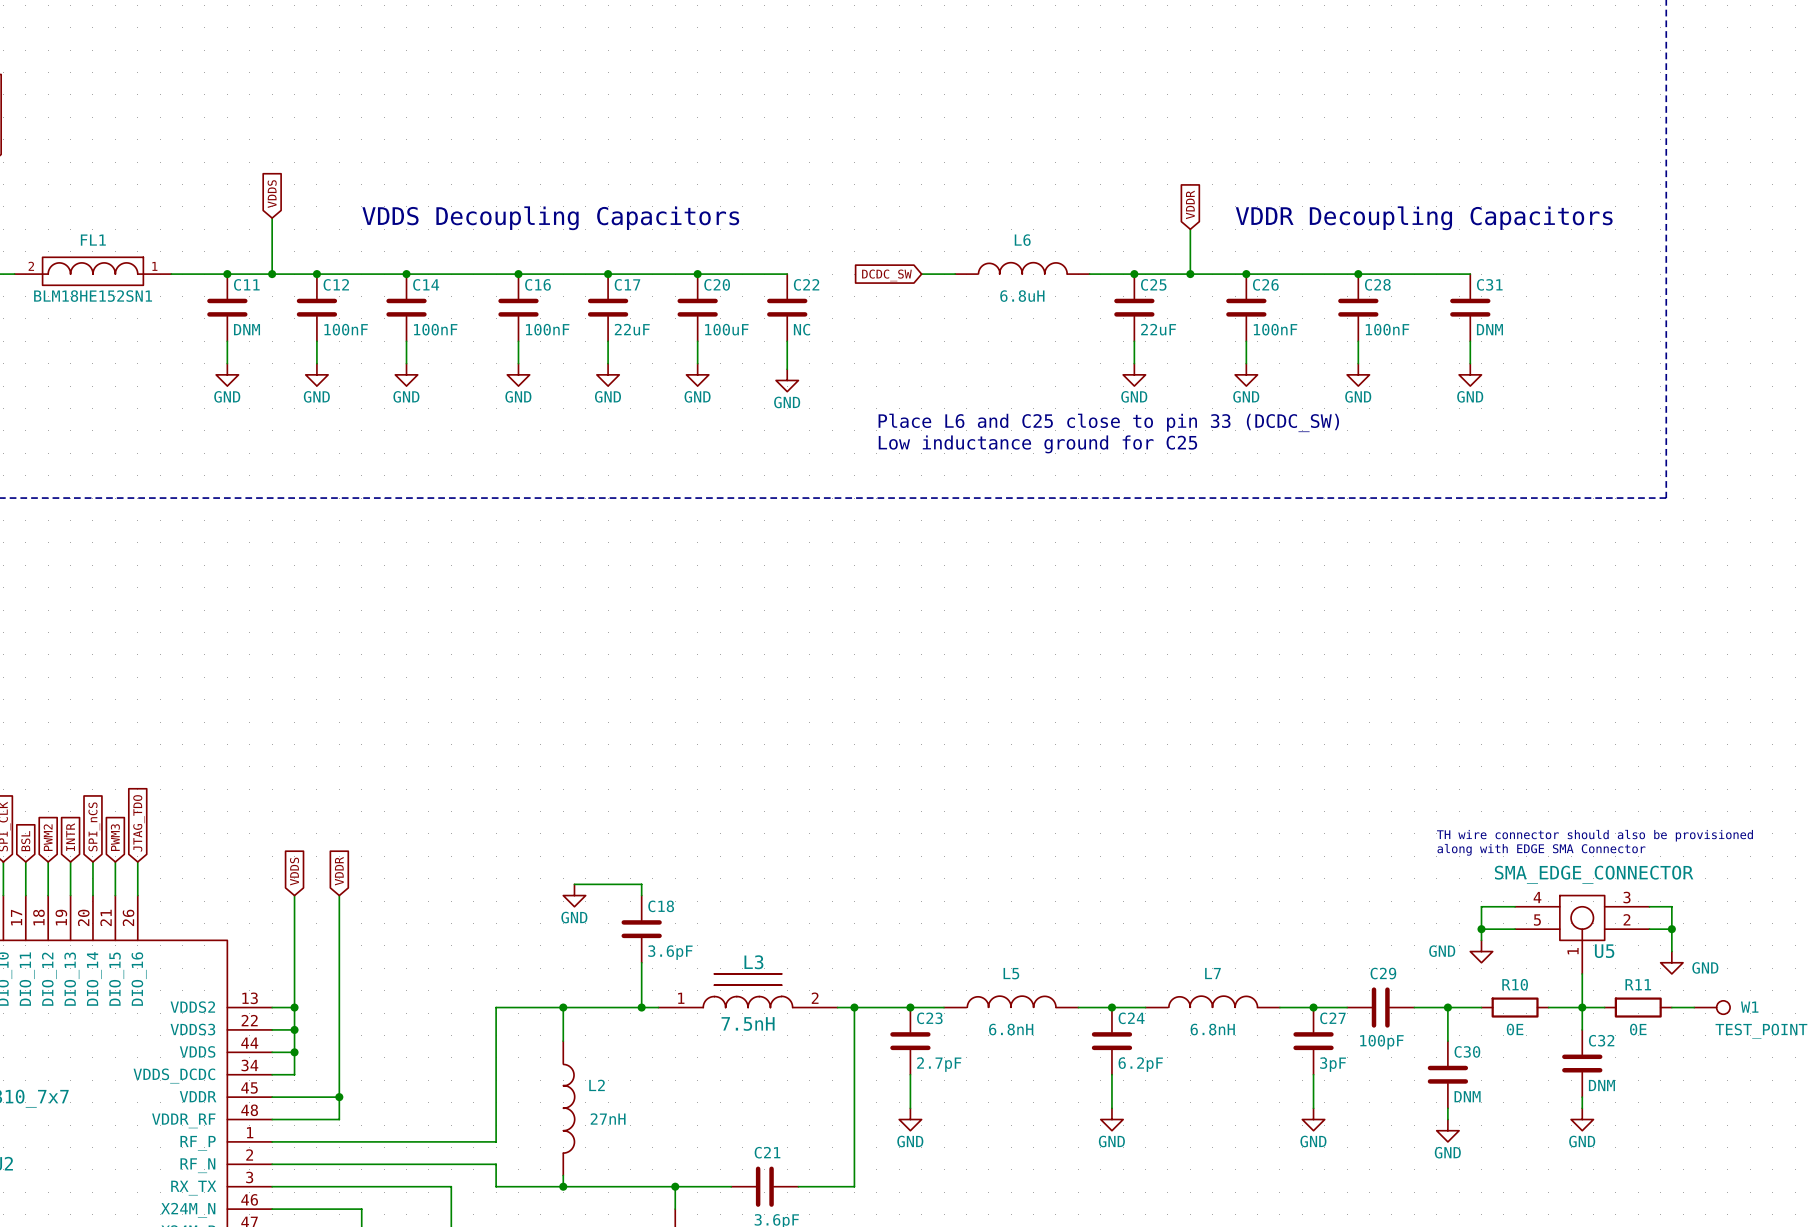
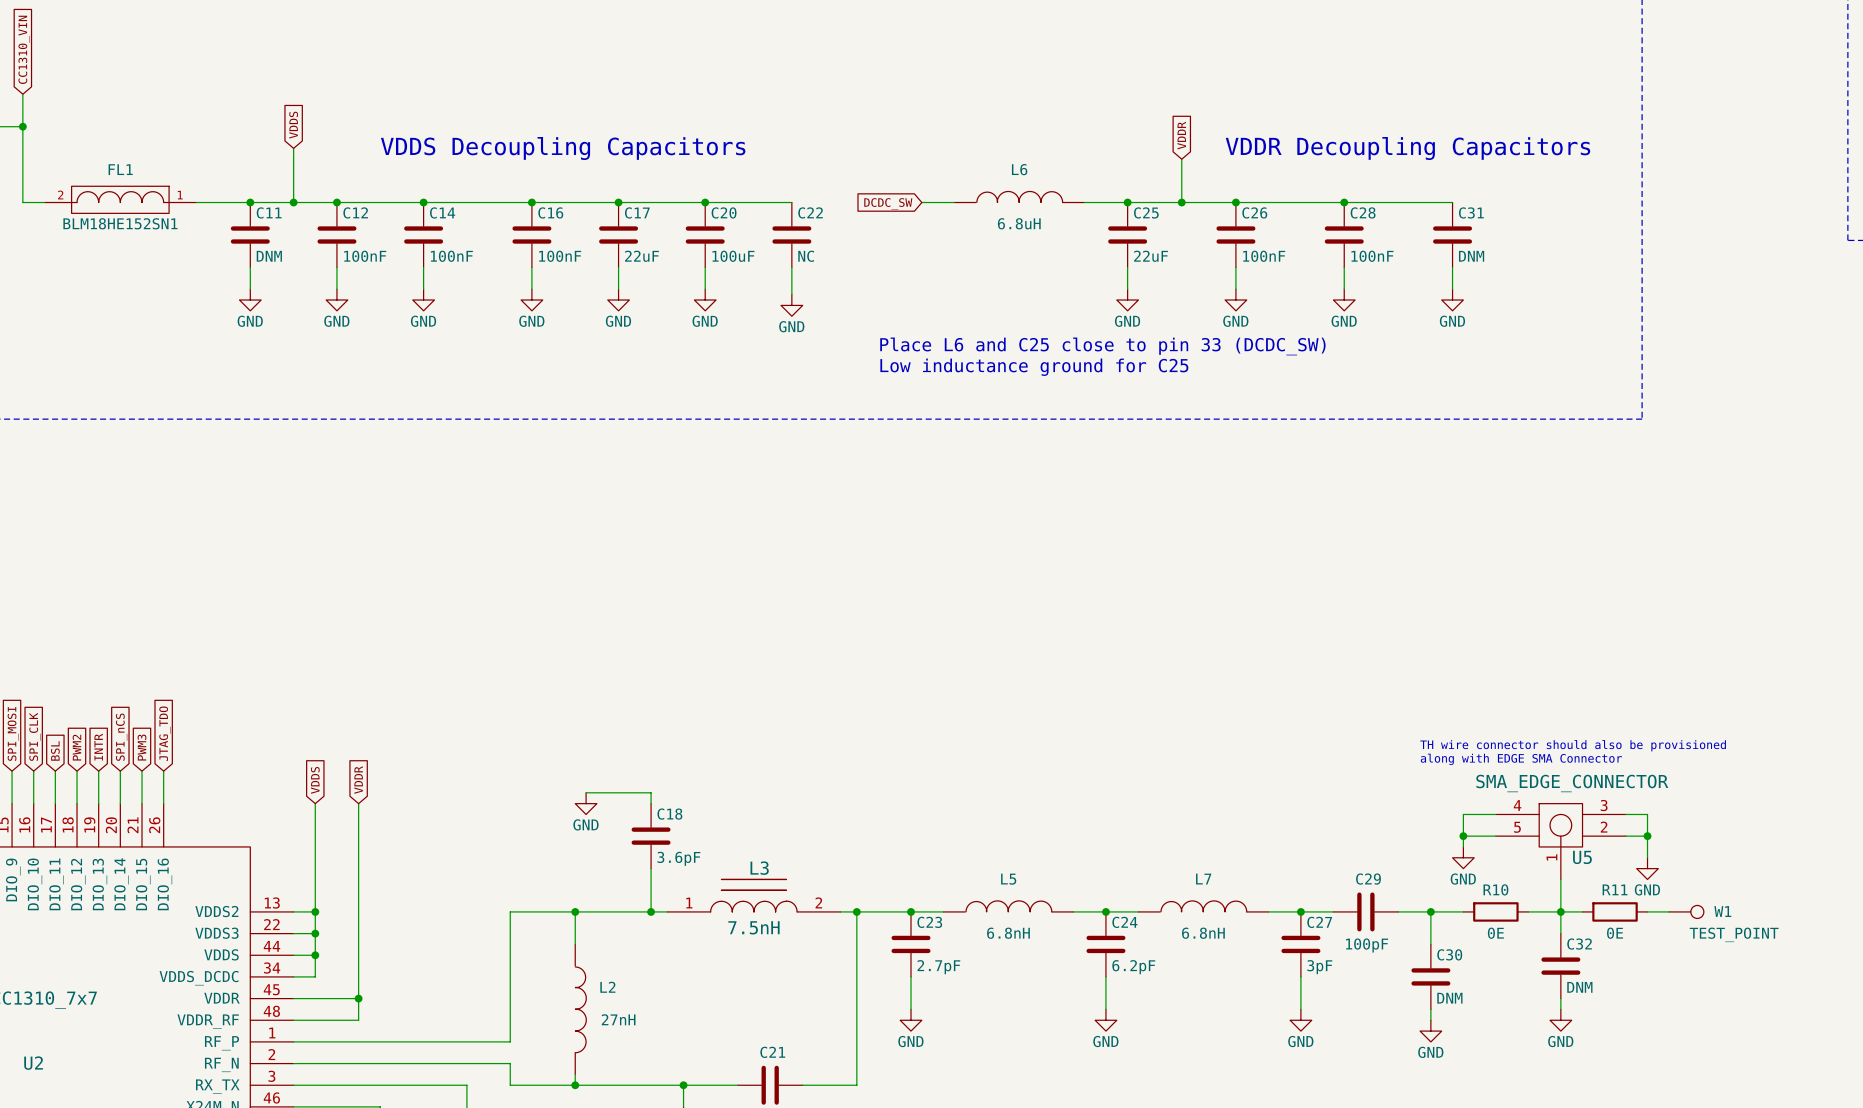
power symbol text position: GND (1442, 951) -> GND (1463, 879)
power symbol text position: GND (1705, 967) -> GND (1647, 889)

